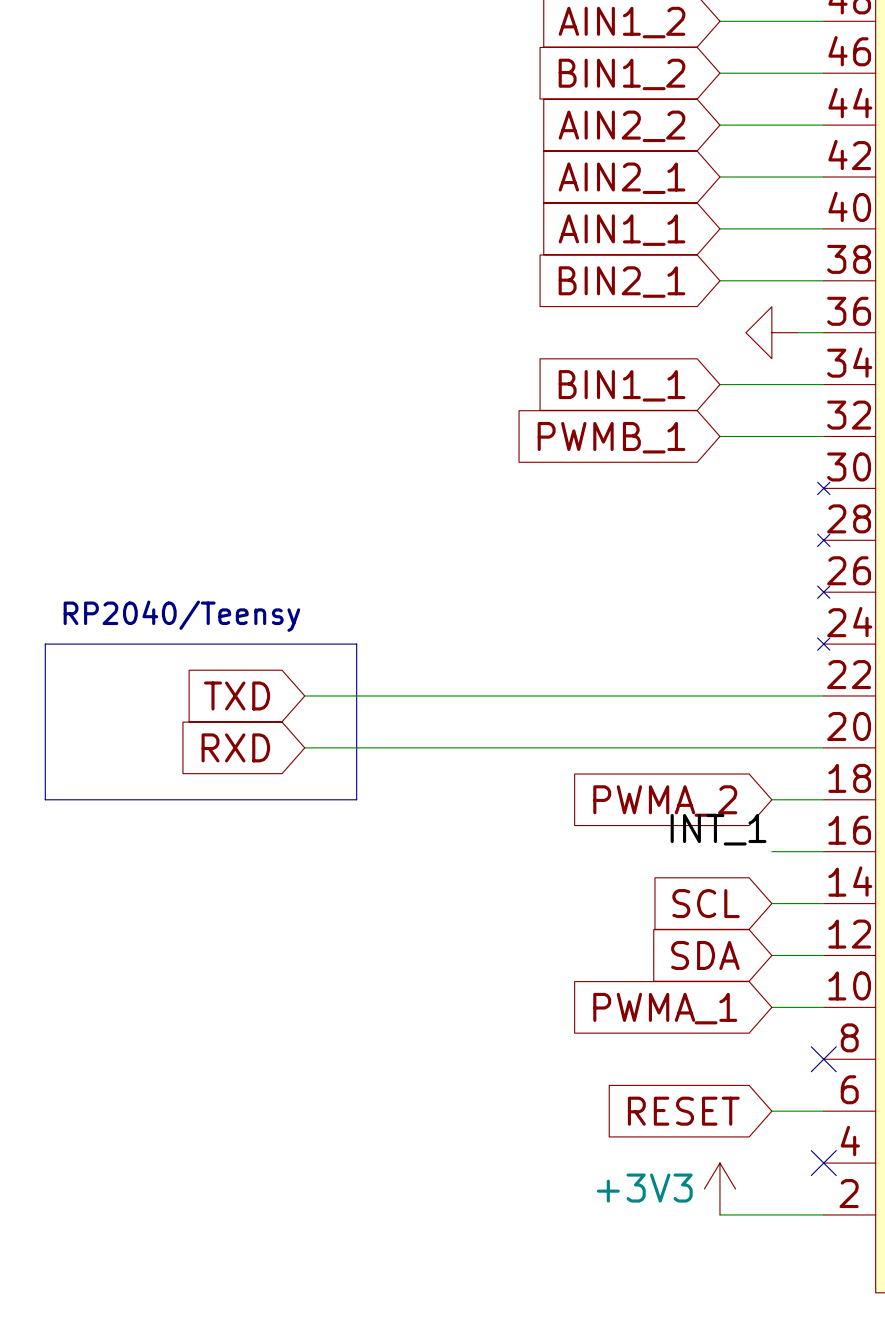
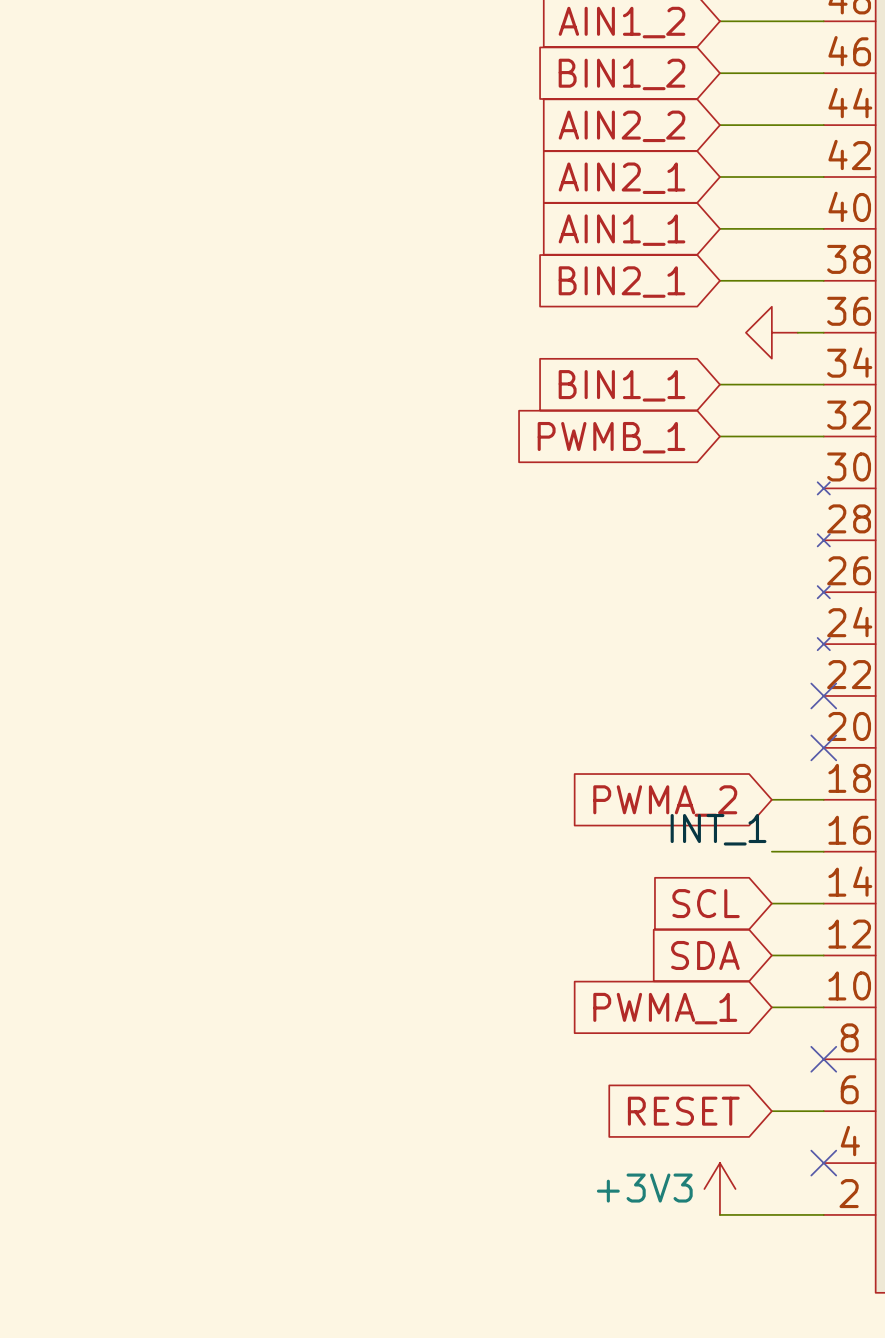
text: RP2040/Teensy (181, 616) -> none
line: (45, 644) (356, 644) (356, 799) (45, 799) (45, 644) -> none
global label: TXD (237, 695) -> none
wire: (304, 695) (823, 695) -> none
no-connect mark: none -> (823, 695)
global label: RXD (235, 747) -> none
wire: (304, 747) (823, 747) -> none
no-connect mark: none -> (823, 747)

